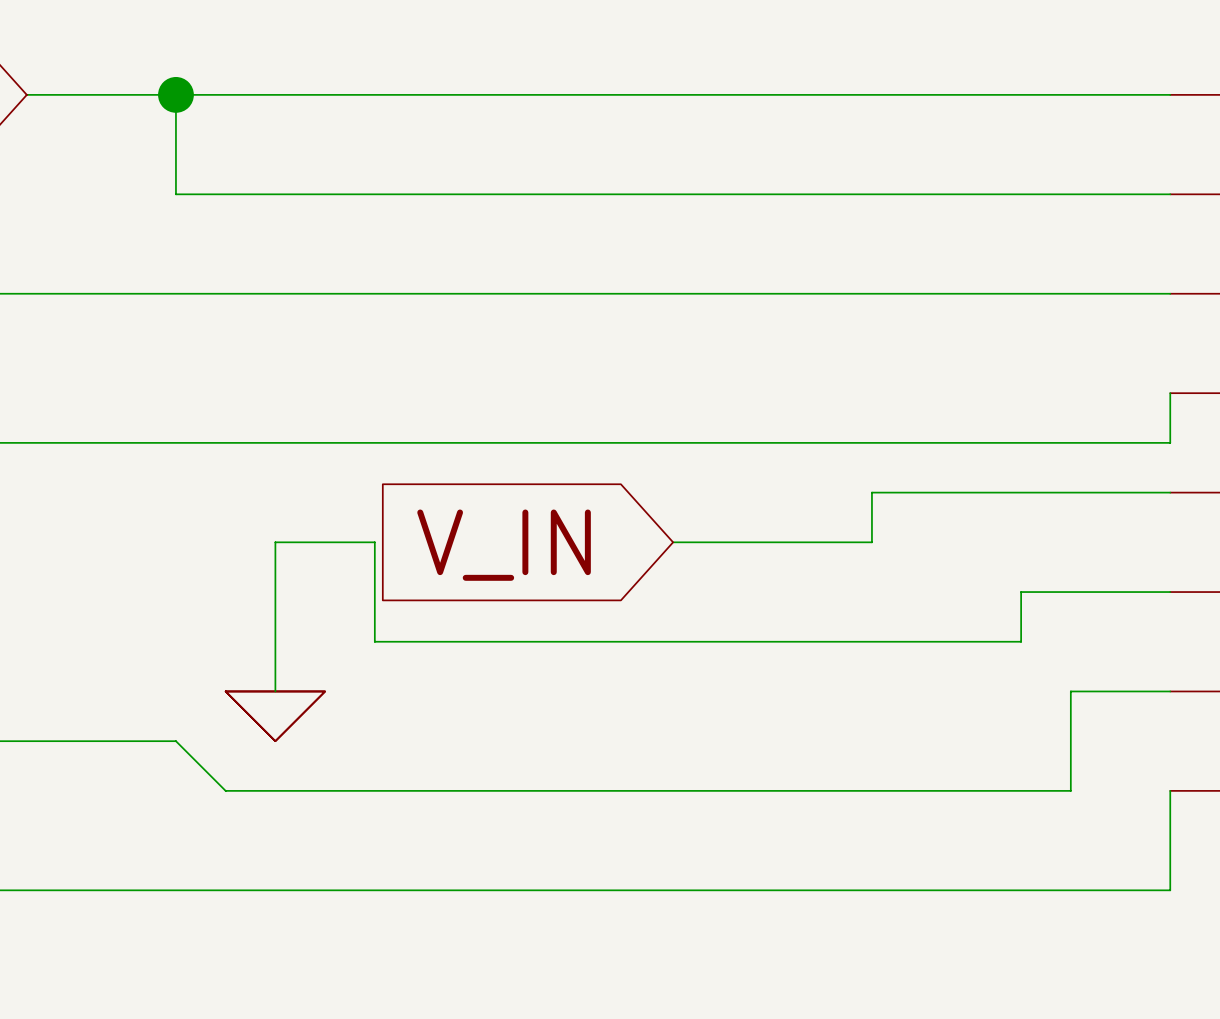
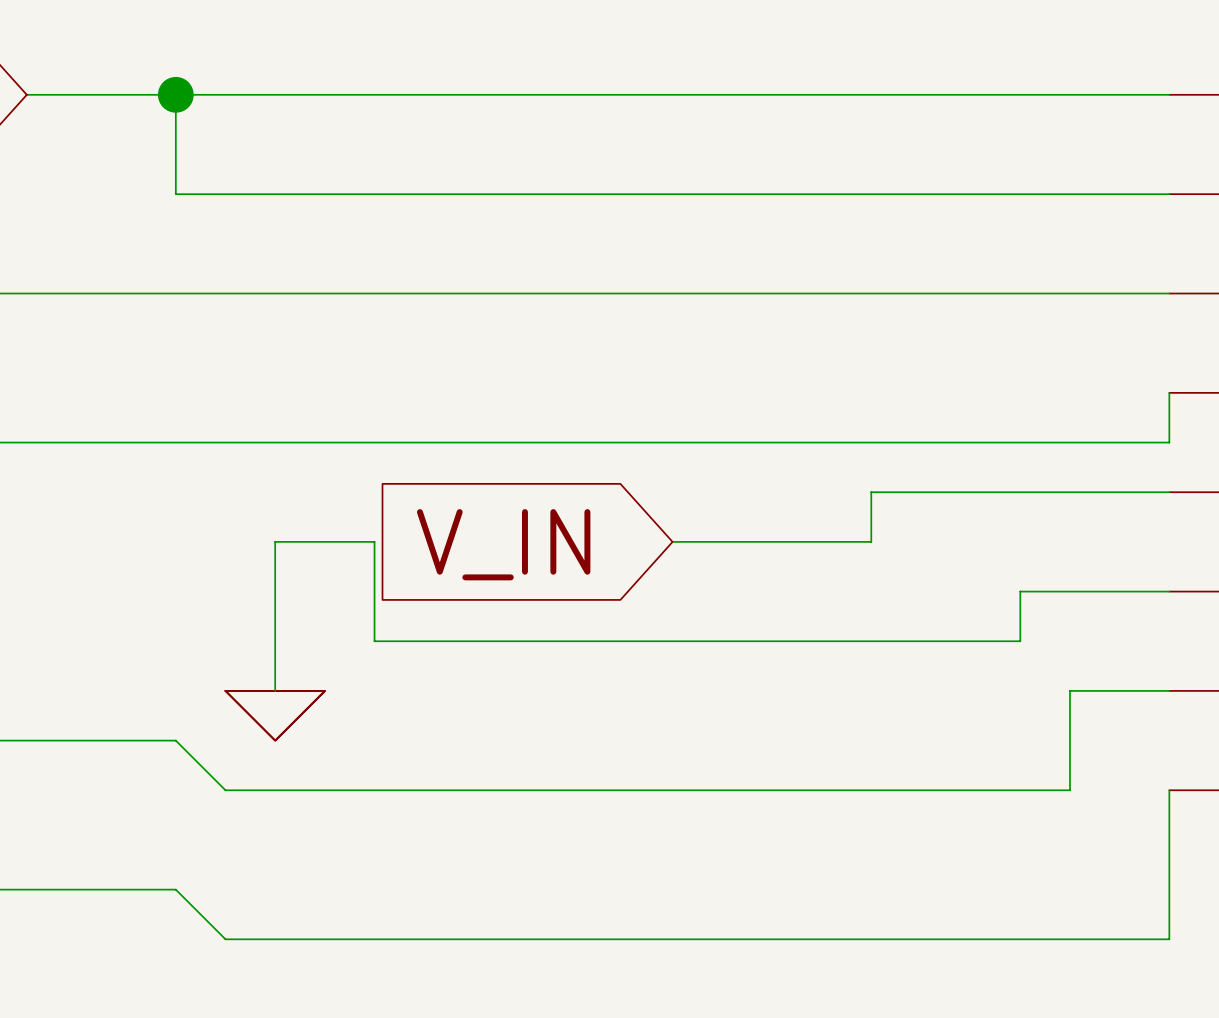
wire: (175, 890) (1170, 890) -> (175, 889) (225, 939) (1169, 939) (1169, 889)

